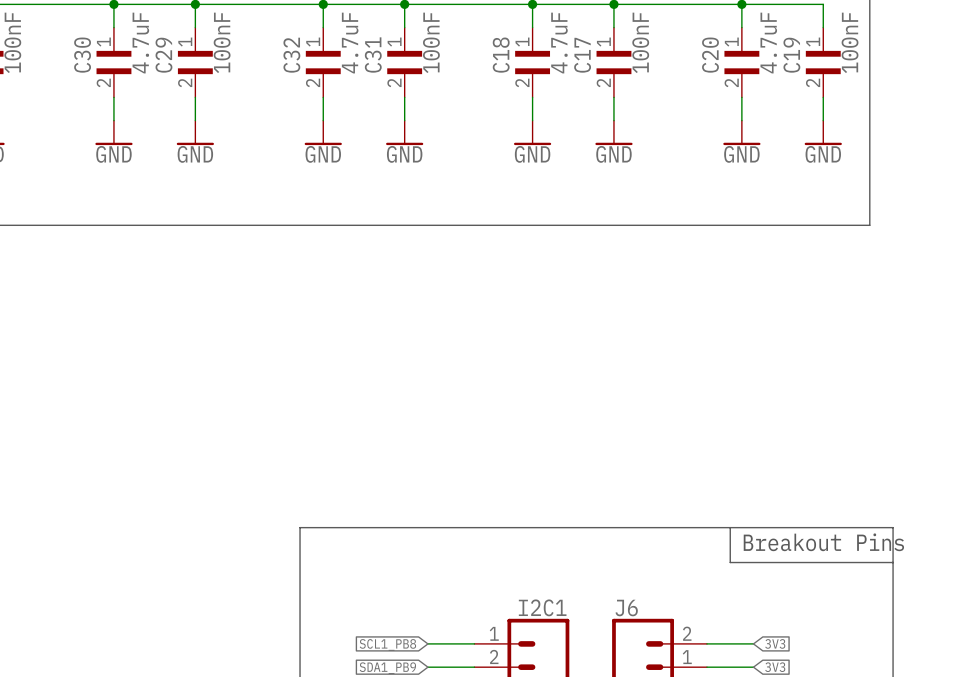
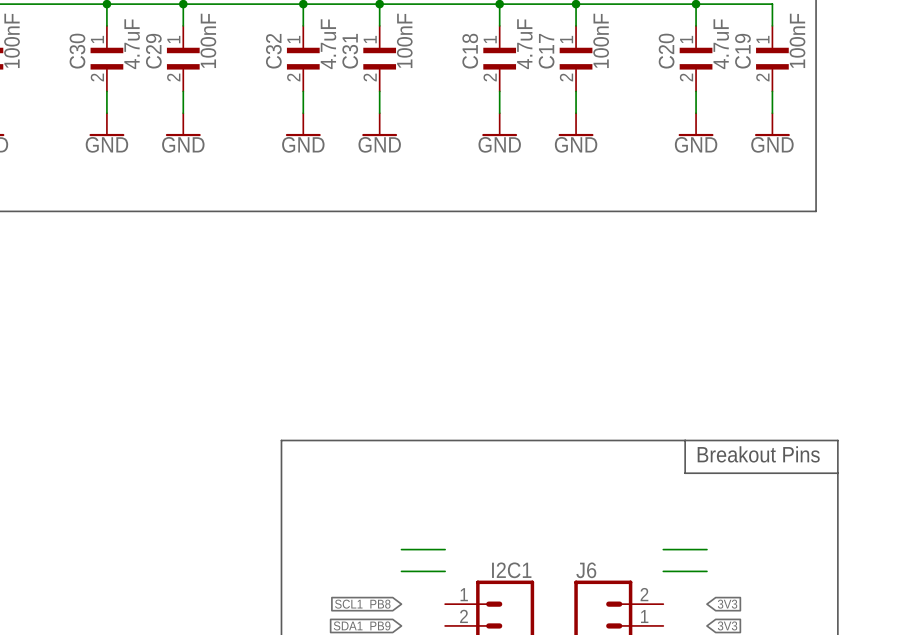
line: (300, 527) (893, 527) -> (281, 495) (281, 440) (837, 440) (837, 495)
line: (730, 527) (730, 562) (893, 562) -> (685, 440) (685, 473) (837, 473)
text position: Breakout Pins (823, 542) -> Breakout Pins (758, 454)
wire: (427, 643) (474, 643) -> (401, 549) (445, 549)
wire: (707, 643) (753, 643) -> (663, 549) (706, 549)
wire: (427, 667) (474, 667) -> (401, 571) (445, 571)
wire: (707, 667) (753, 667) -> (663, 571) (706, 571)

